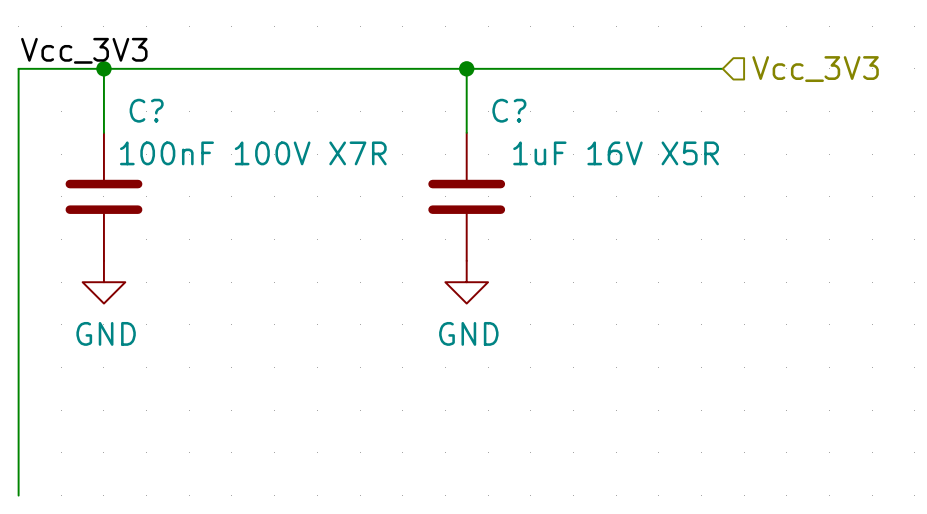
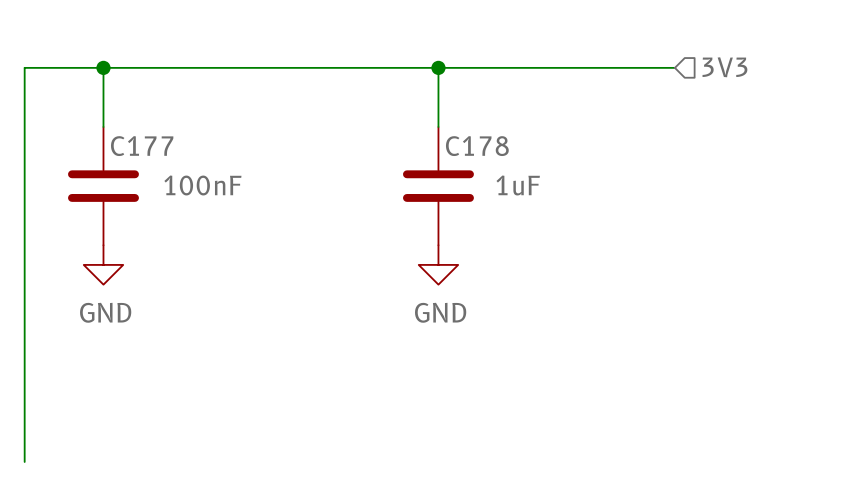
label: Vcc_3V3 (84, 50) -> none
hierarchical label: Vcc_3V3 (815, 69) -> 3V3 (724, 67)
C? name: C? (146, 110) -> C177 (142, 146)
C? name: C? (509, 110) -> C178 (477, 146)
C? value: 100nF 100V X7R (253, 153) -> 100nF (202, 185)
C? value: 1uF 16V X5R (616, 153) -> 1uF (518, 185)

